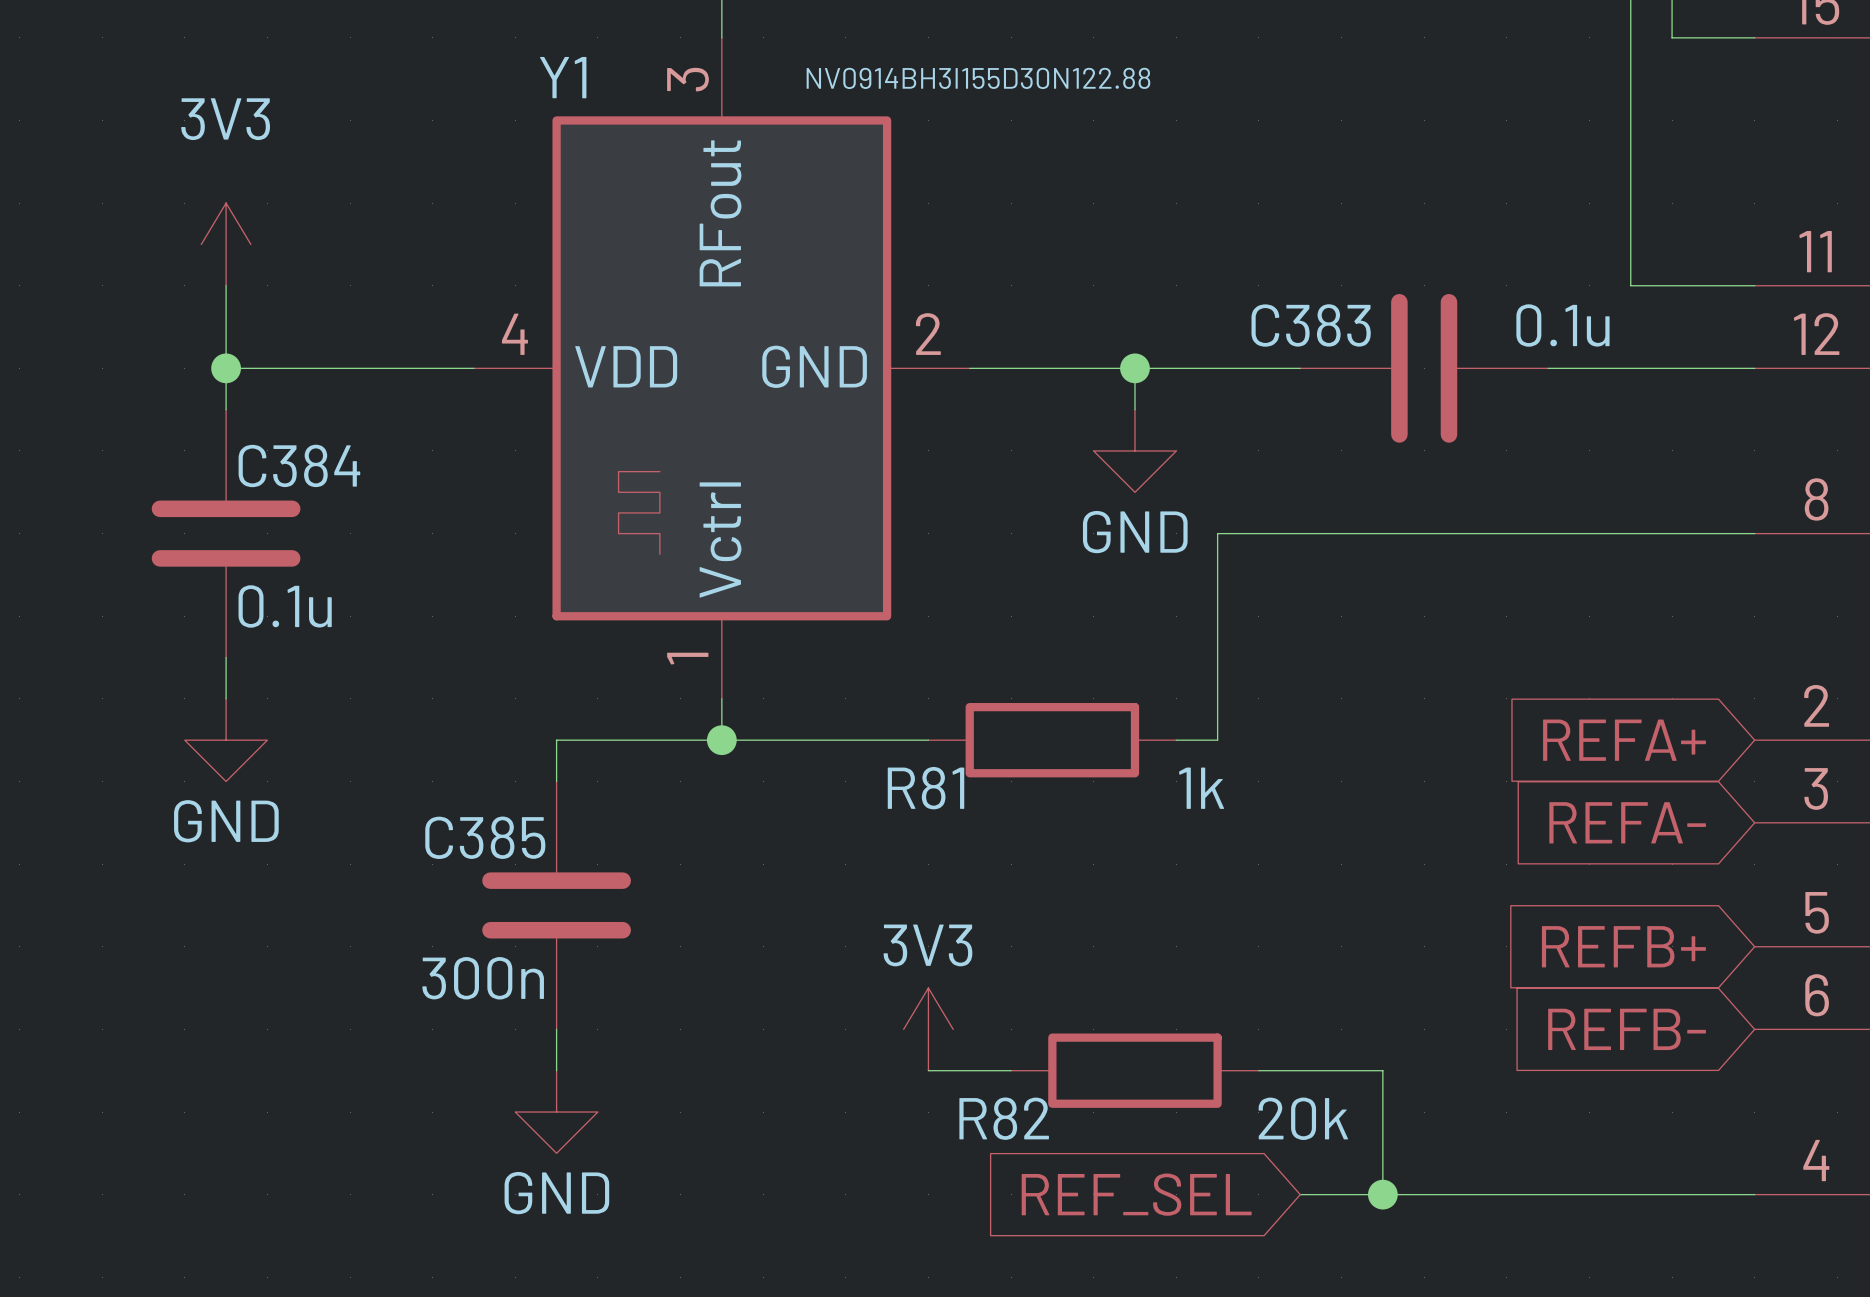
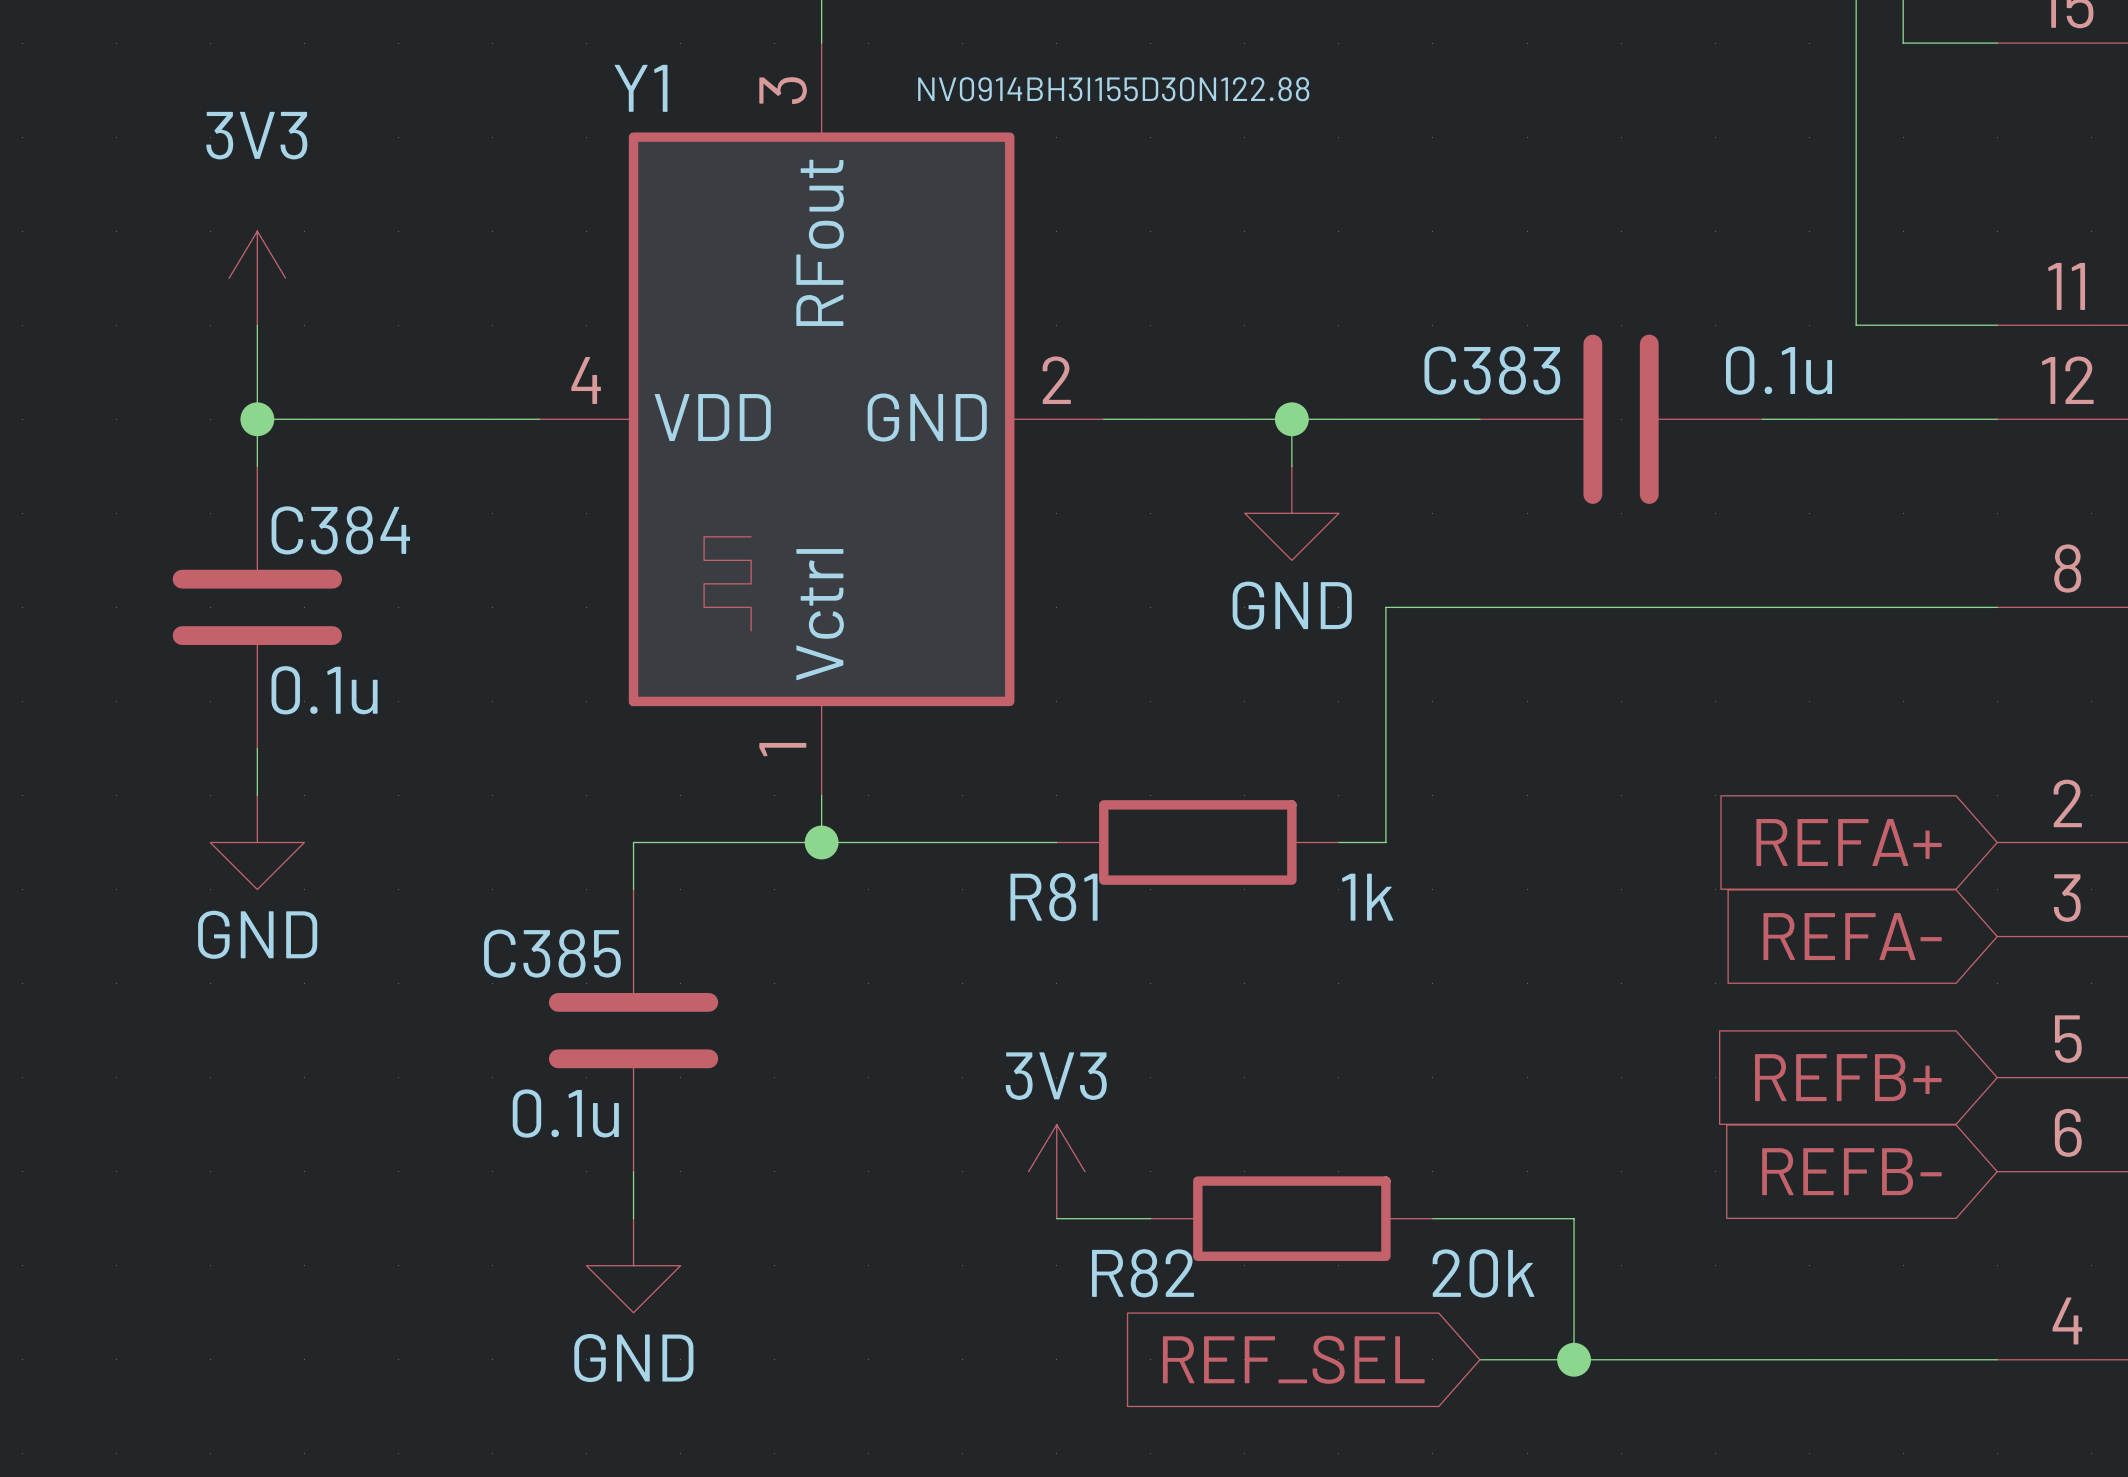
C385 value: 300n (483, 978) -> 0.1u (565, 1113)

